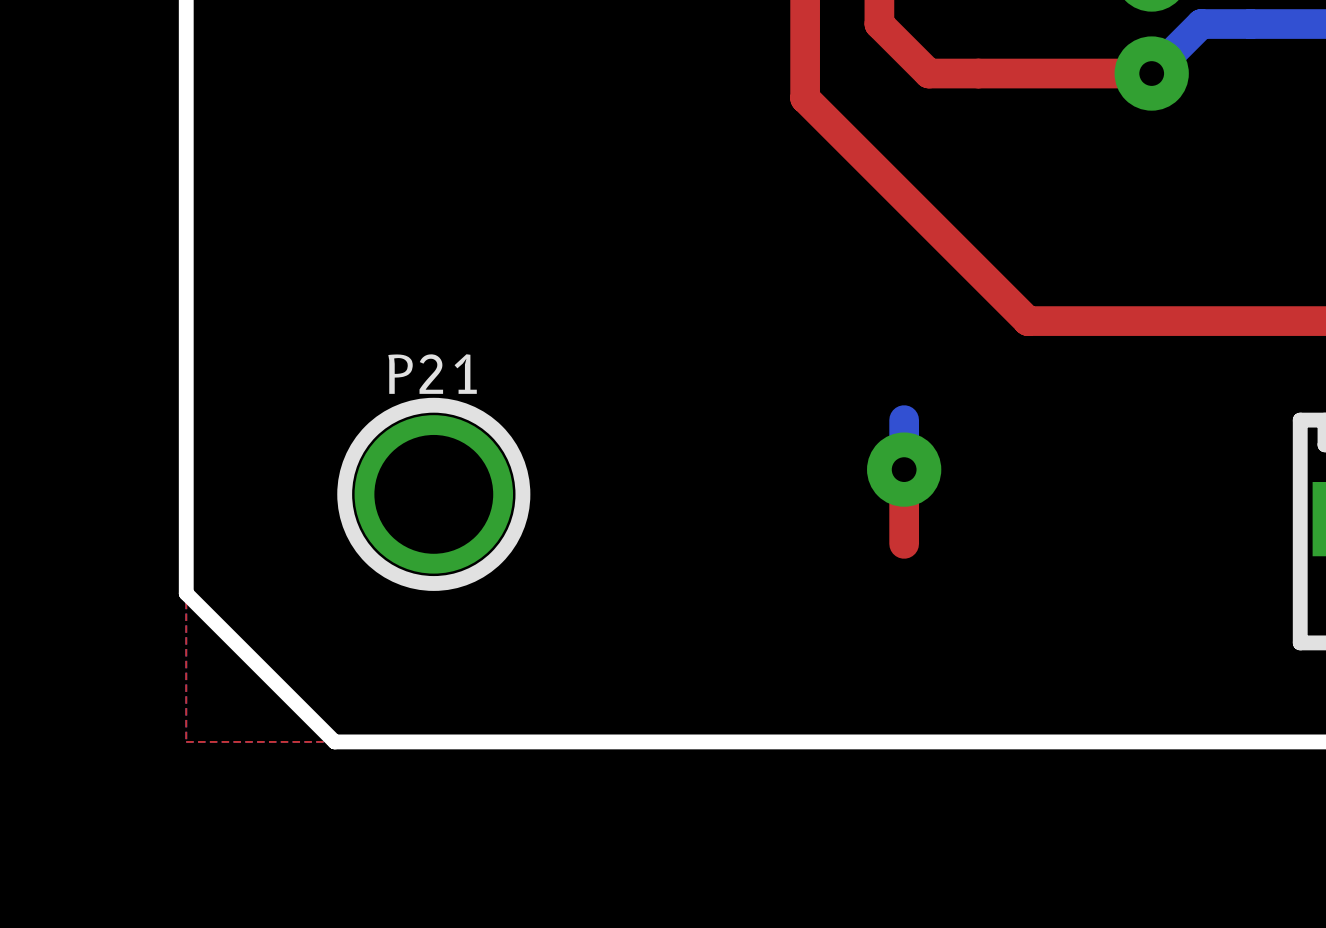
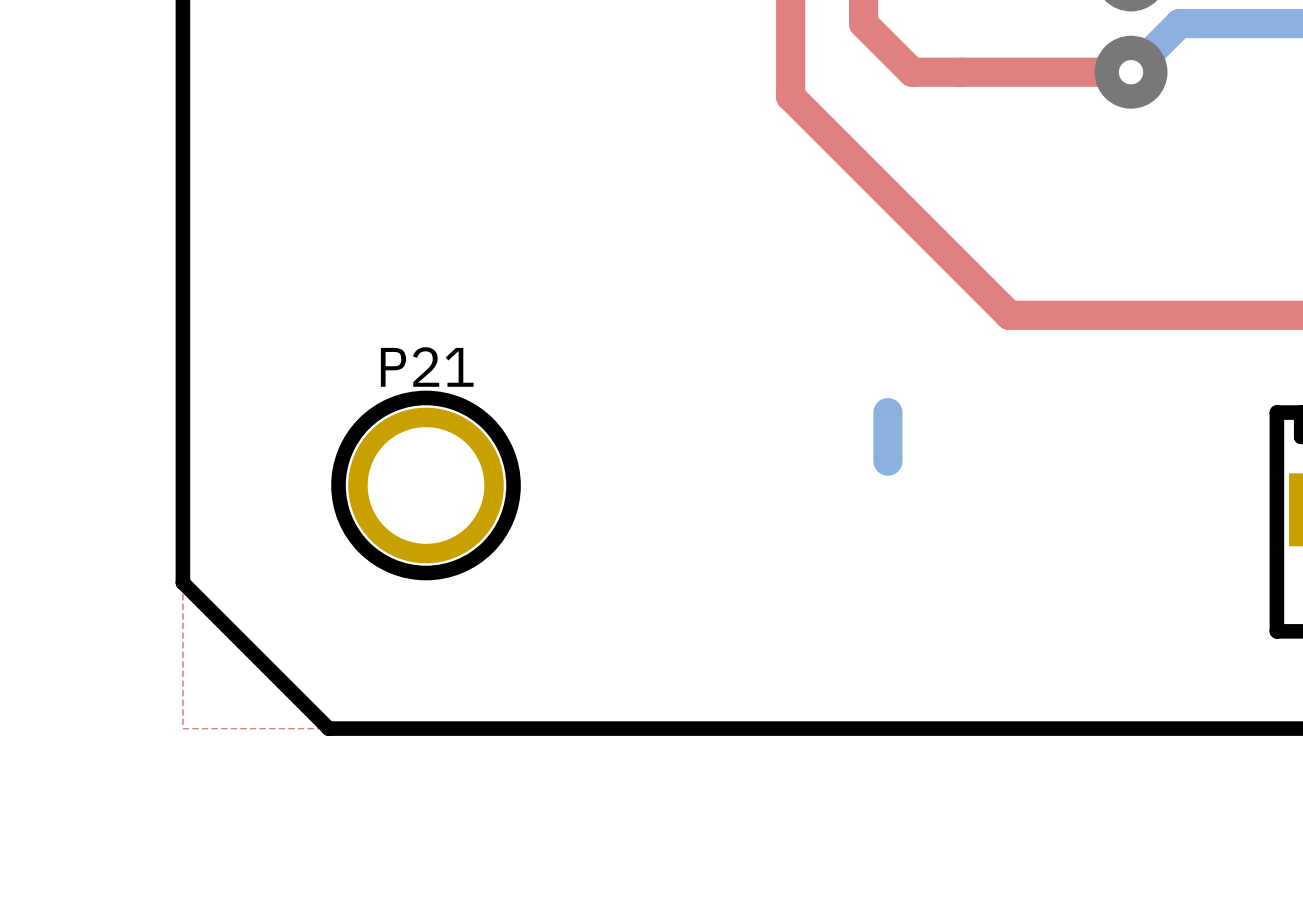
top track: (904, 469) (904, 543) -> none
via: (904, 469) -> none

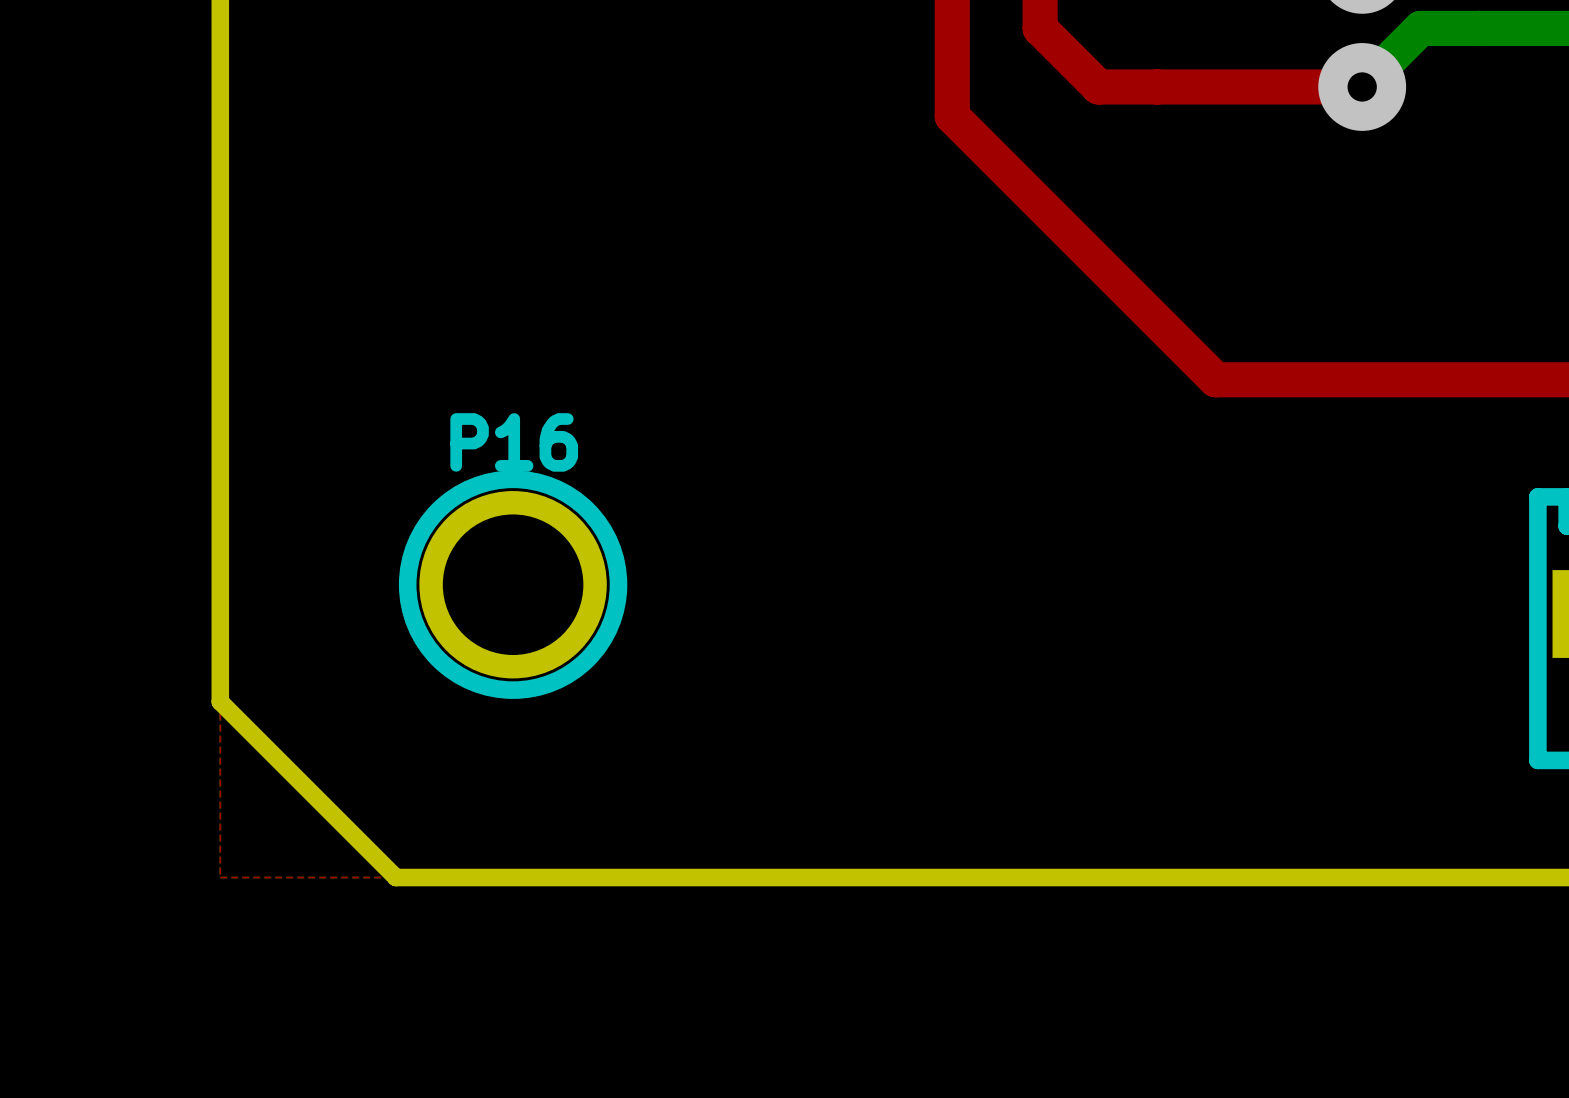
P21 name: P21 (427, 367) -> P16 (514, 442)
bottom track: (887, 412) (887, 461) -> none

